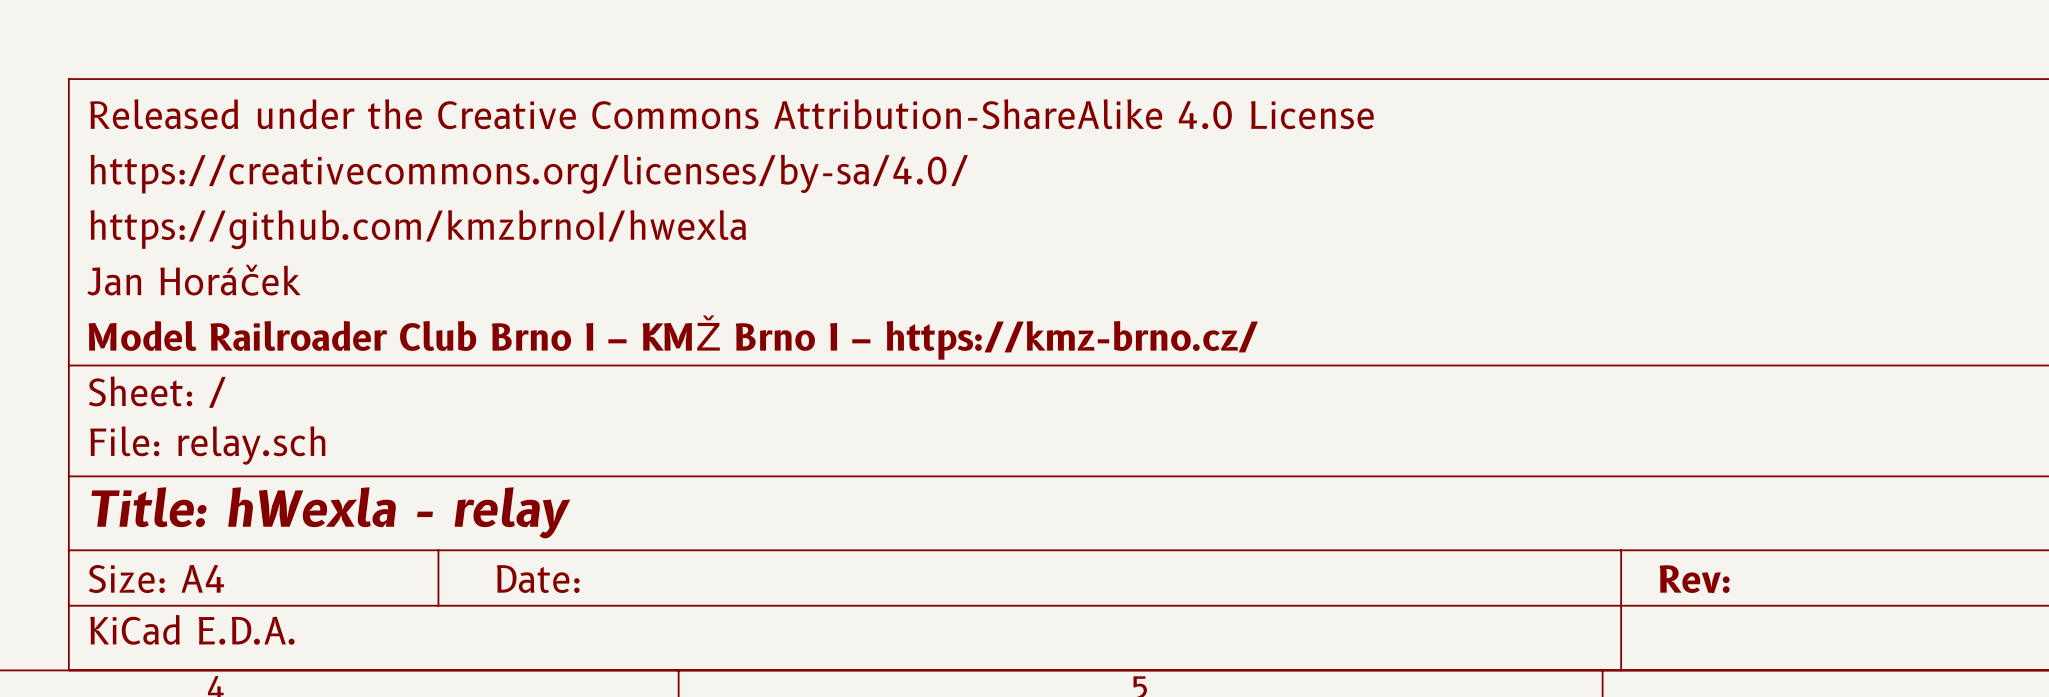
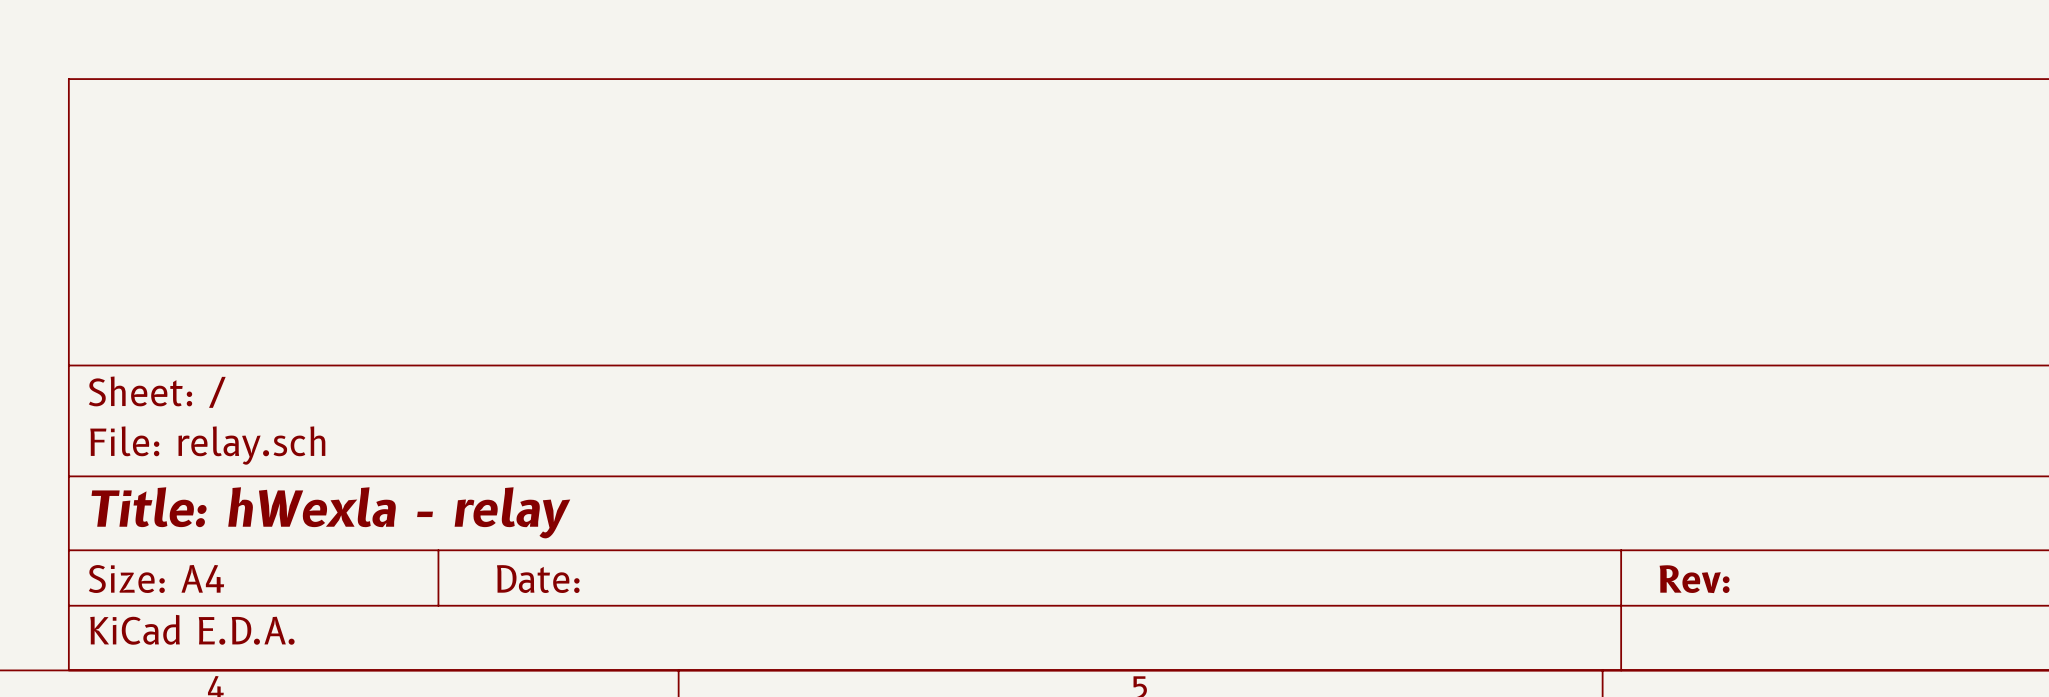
title block: Released under the Creative Commons Attribution-ShareAlike 4.0 License (731, 114) -> none
title block: https://creativecommons.org/licenses/by-sa/4.0/ (529, 174) -> none
title block: https://github.com/kmzbrnoI/hwexla (418, 229) -> none
title block: Jan Horáček (193, 280) -> none
title block: Model Railroader Club Brno I – KMŽ Brno I – https://kmz-brno.cz/ (673, 337) -> none

